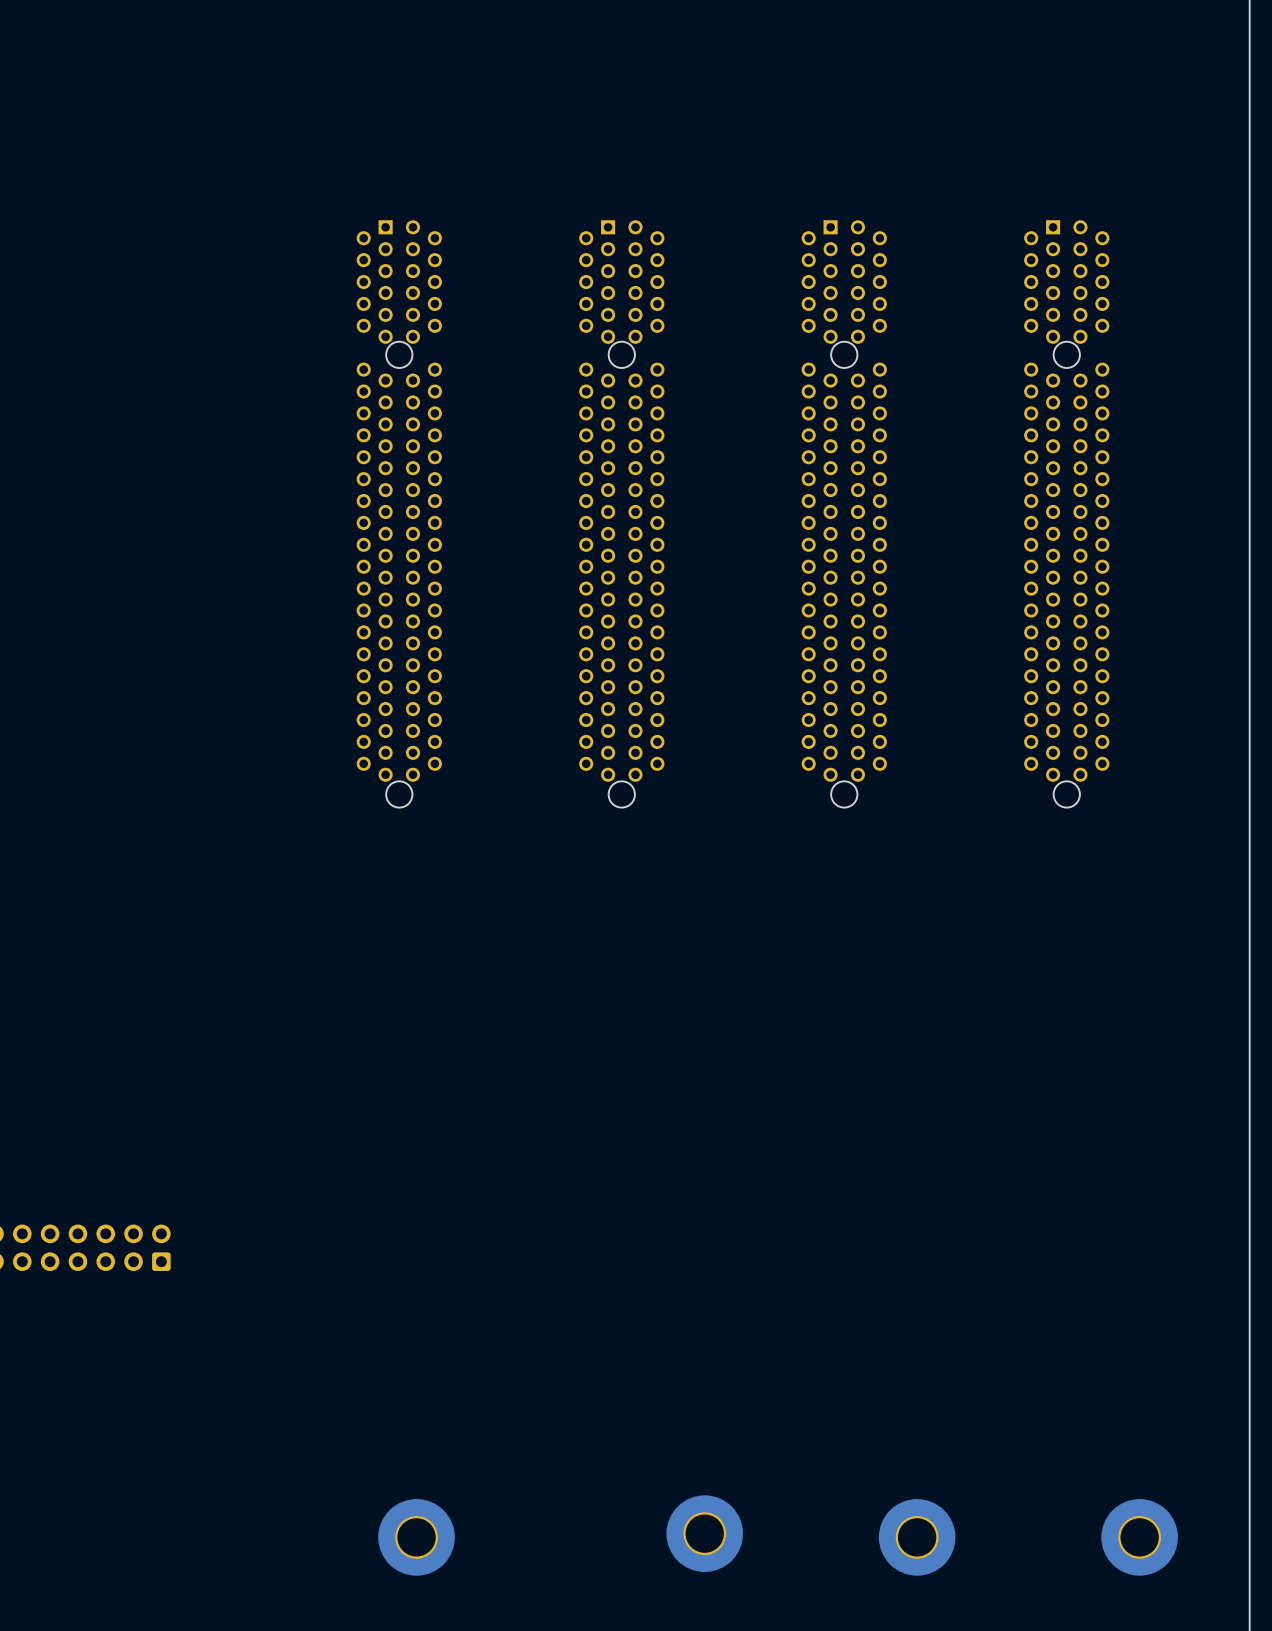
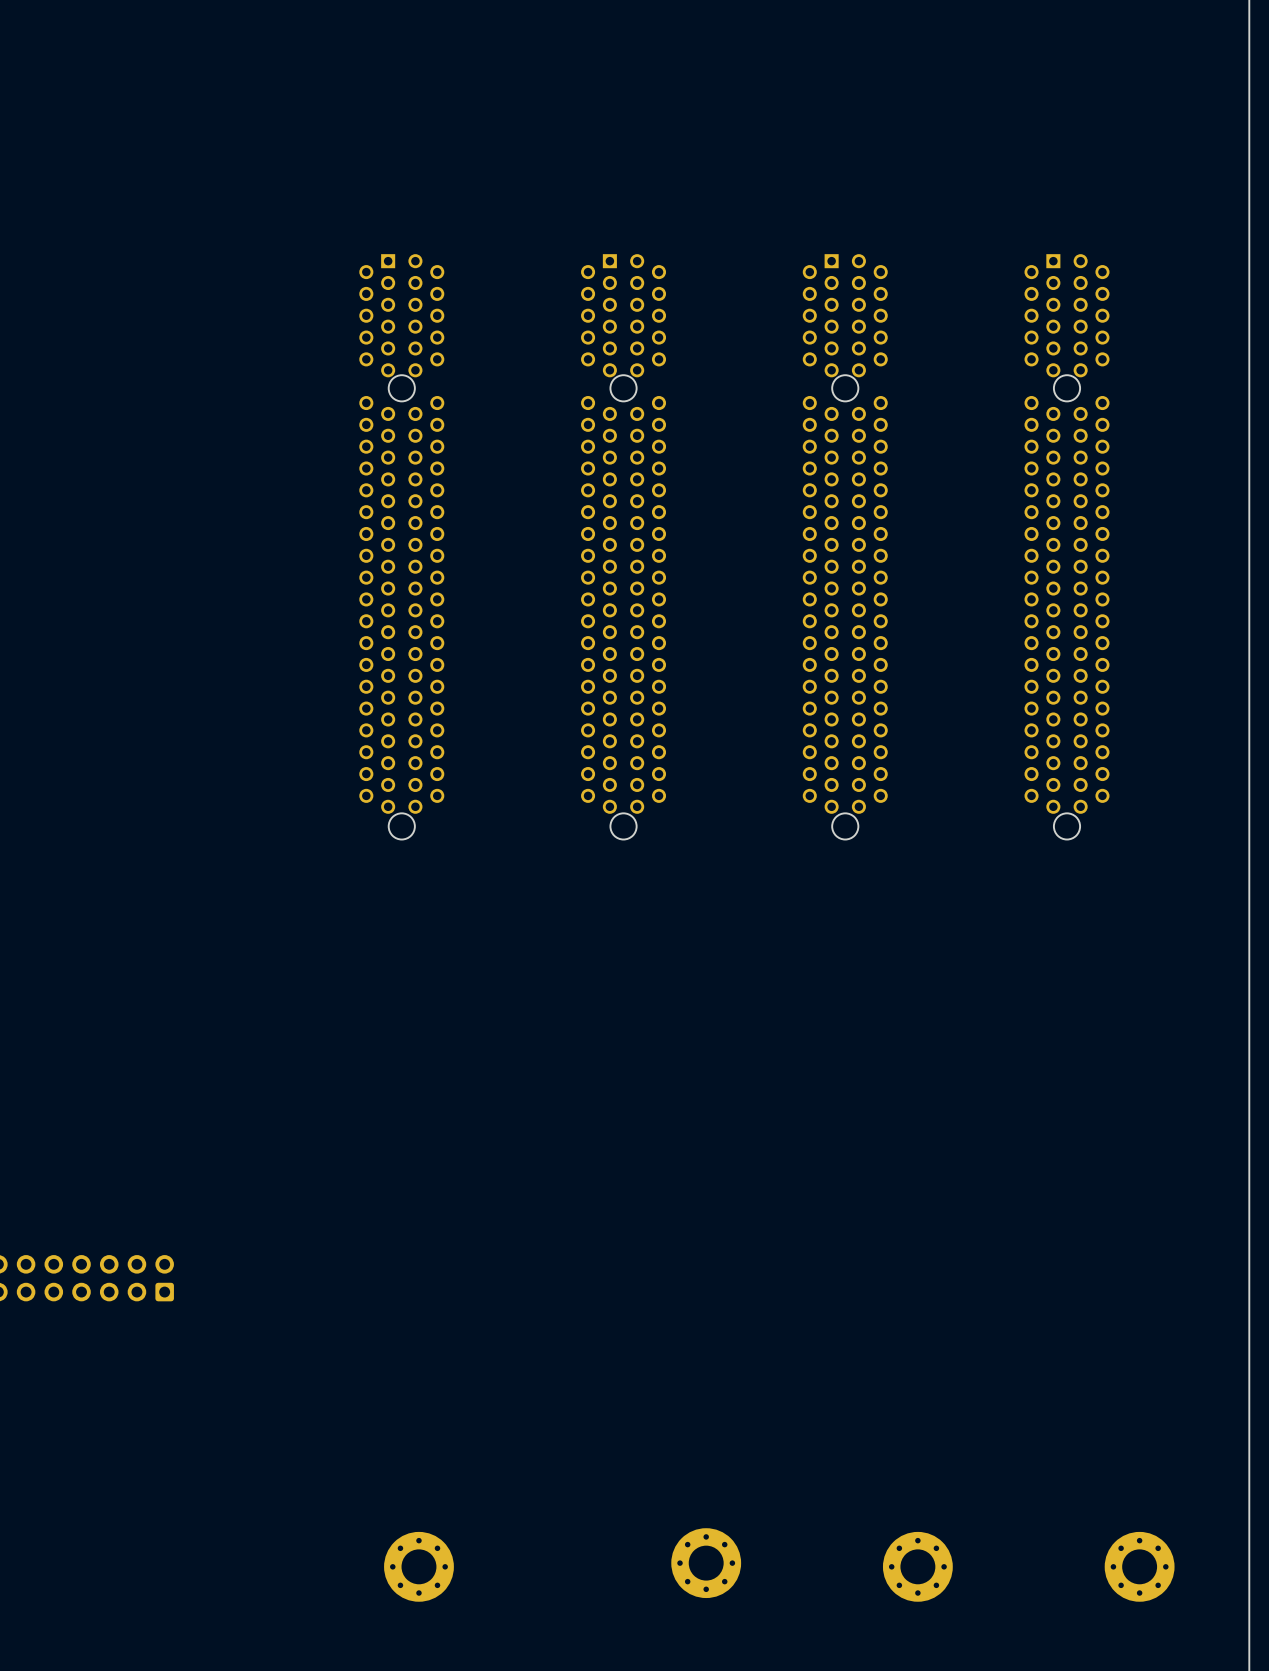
part footprint: [666, 1495, 744, 1572] -> [671, 1528, 742, 1599]
part footprint: [378, 1499, 455, 1576] -> [384, 1531, 454, 1602]
part footprint: [878, 1499, 956, 1576] -> [882, 1531, 953, 1602]
part footprint: [1101, 1499, 1178, 1576] -> [1104, 1531, 1175, 1602]

